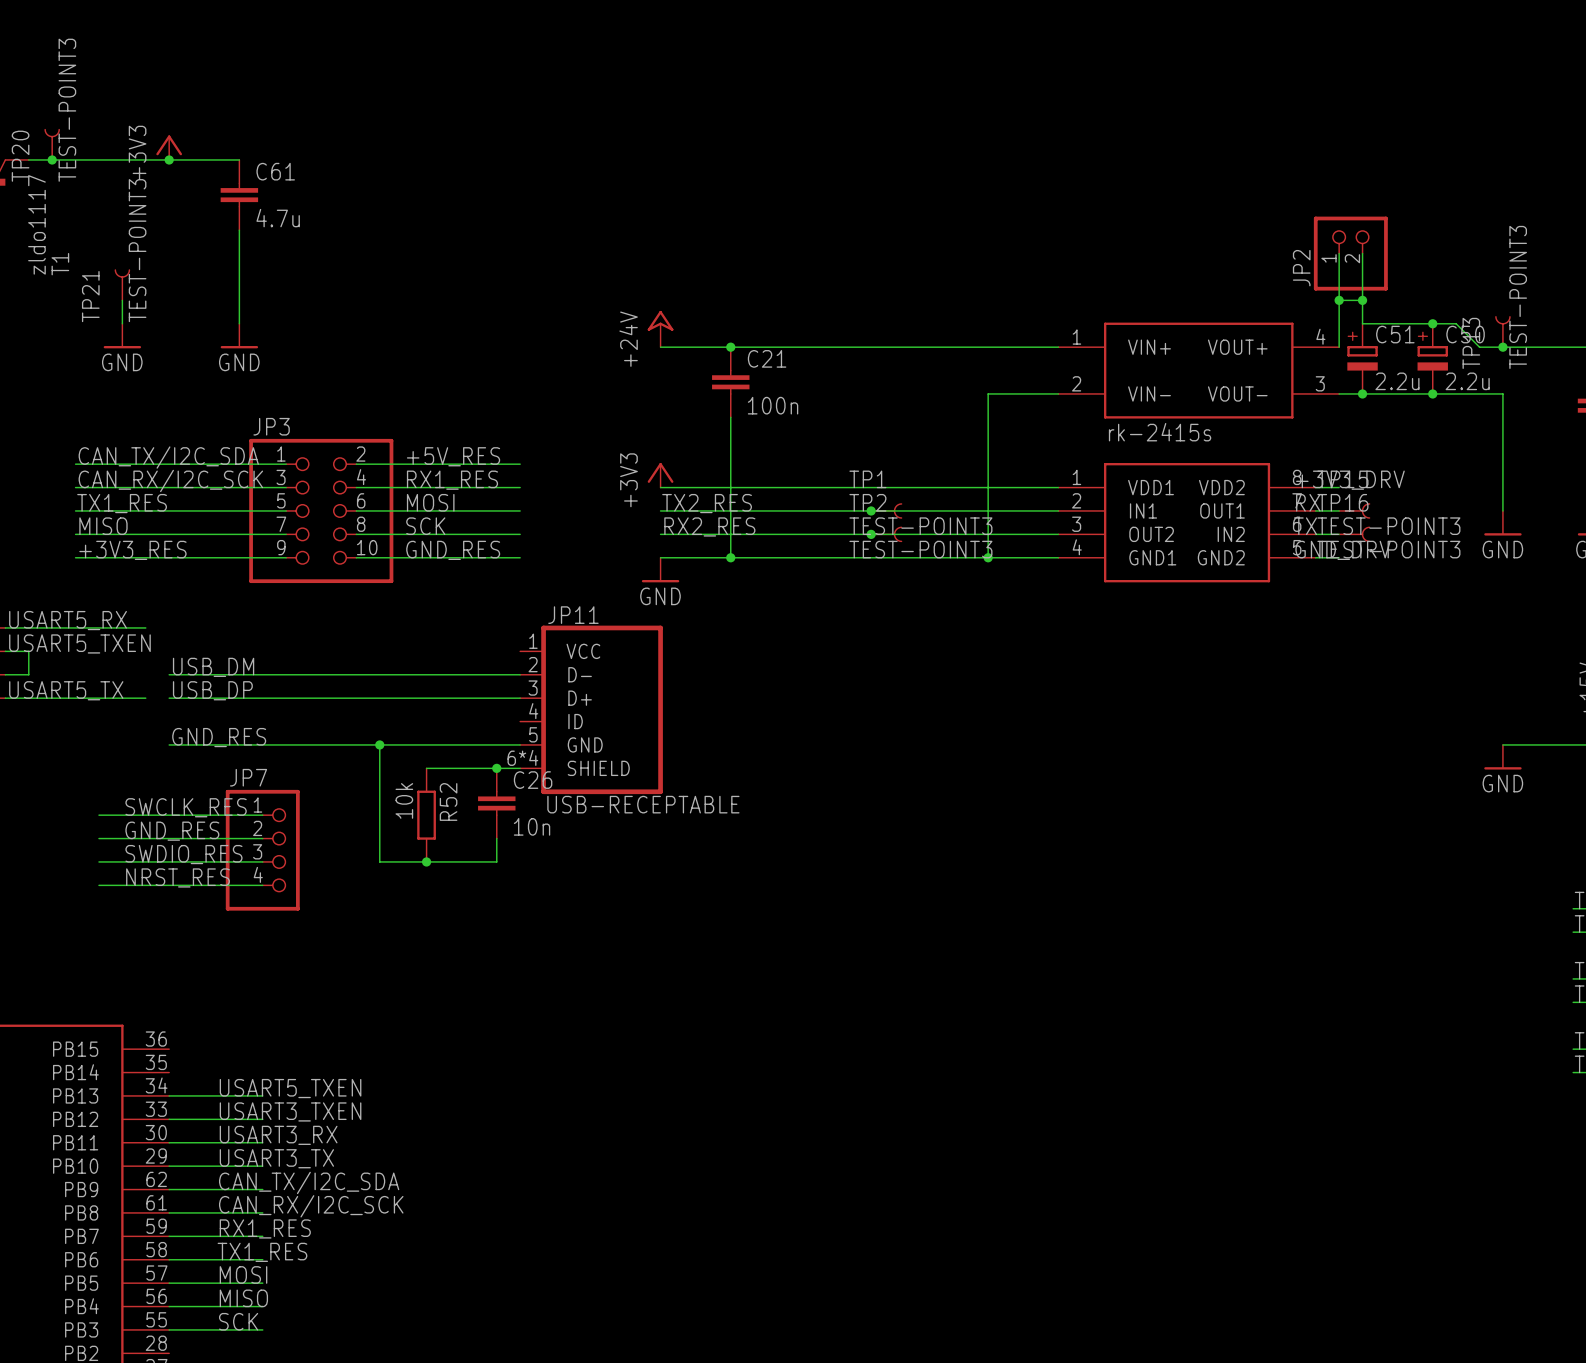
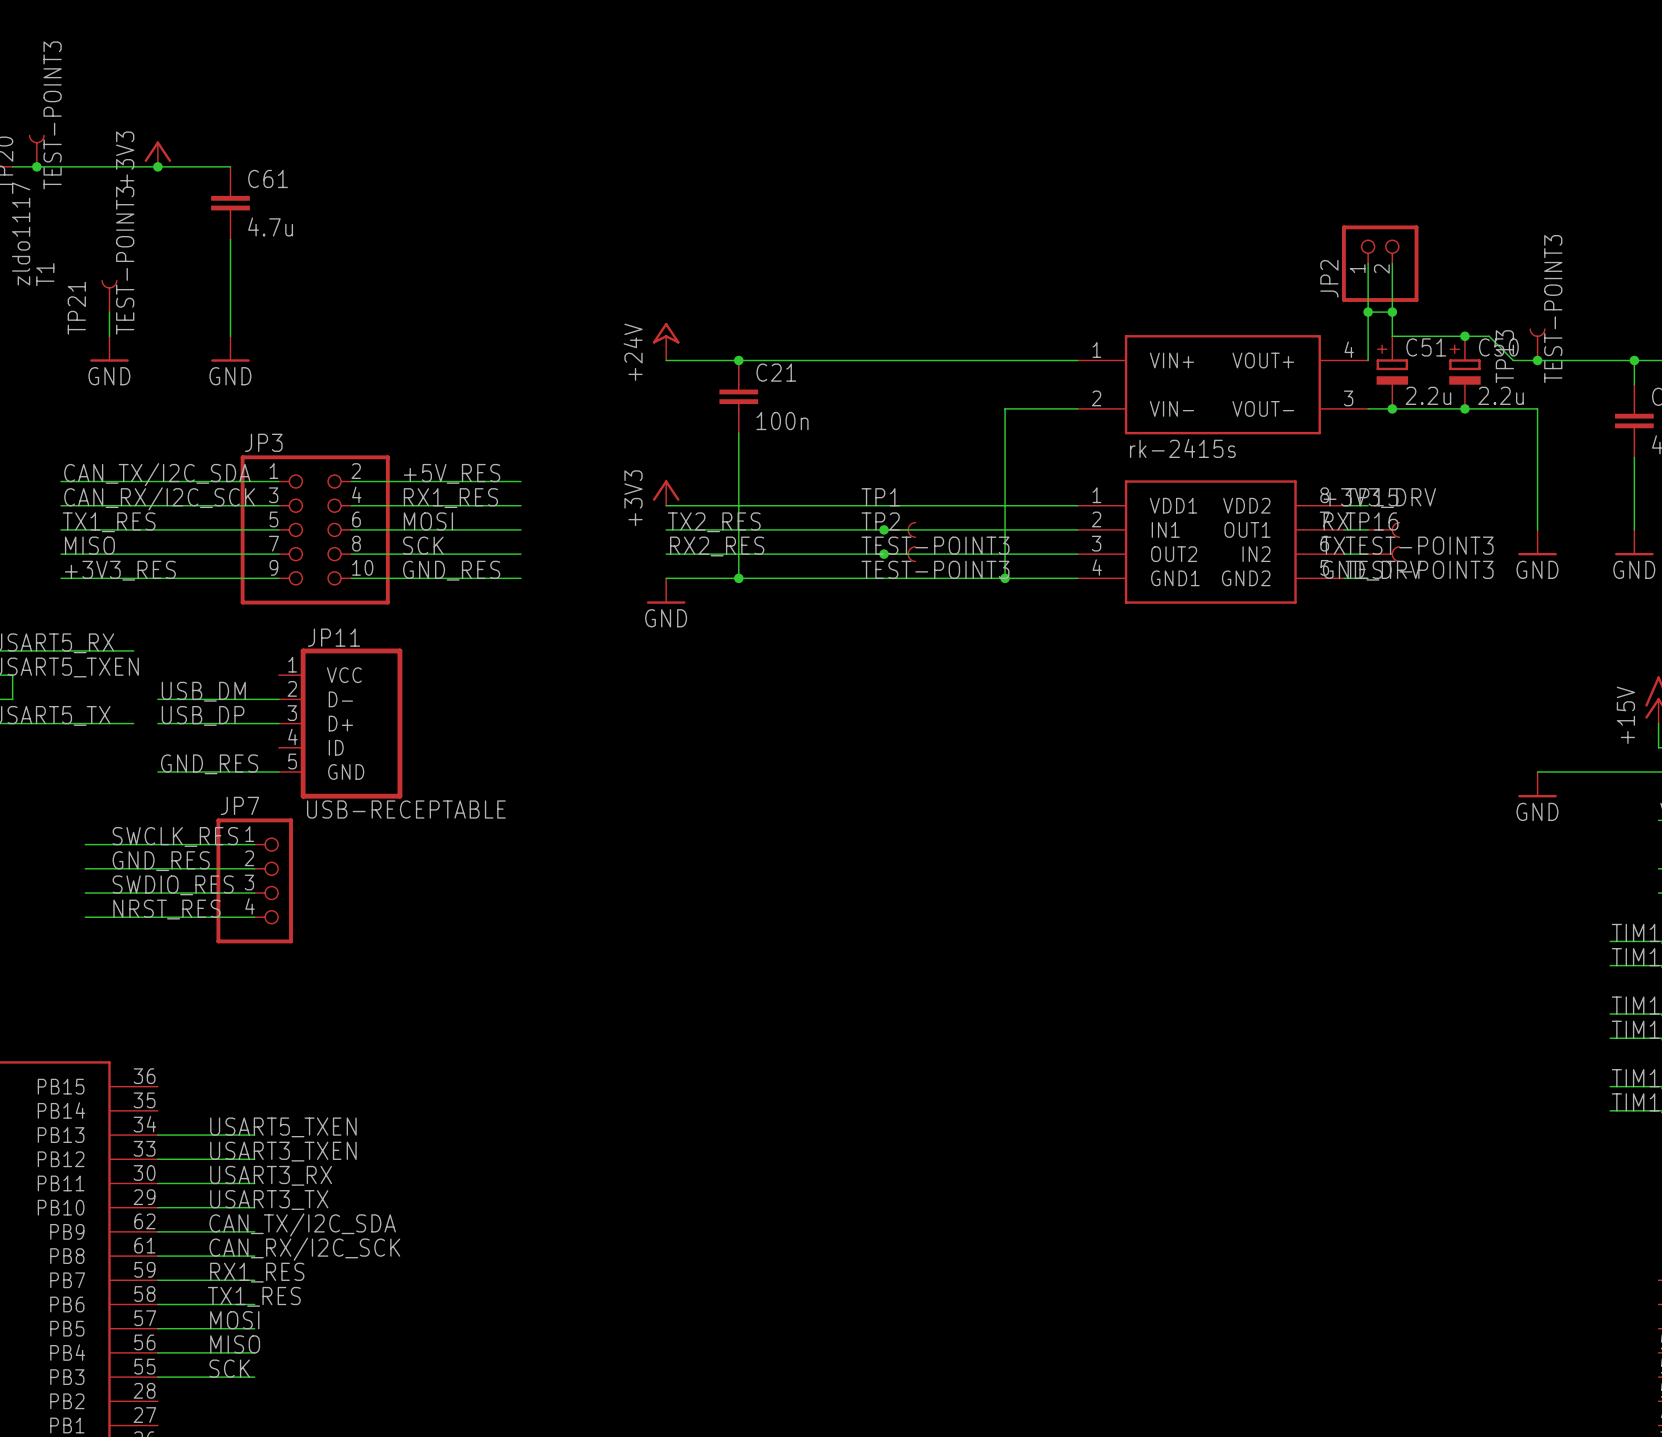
JP11 symbol: [520, 625, 663, 795] -> [278, 648, 403, 799]
wire: (286, 674) (520, 674) -> none
wire: (286, 698) (520, 698) -> none
wire: (286, 744) (520, 744) -> none
wire: (379, 744) (379, 861) (496, 861) (496, 838) -> none
junction: (379, 744) -> none
wire: (426, 768) (520, 768) -> none
junction: (496, 768) -> none
C26: 10n (496, 803) -> none
R52: 10k (426, 815) -> none
junction: (426, 861) -> none

